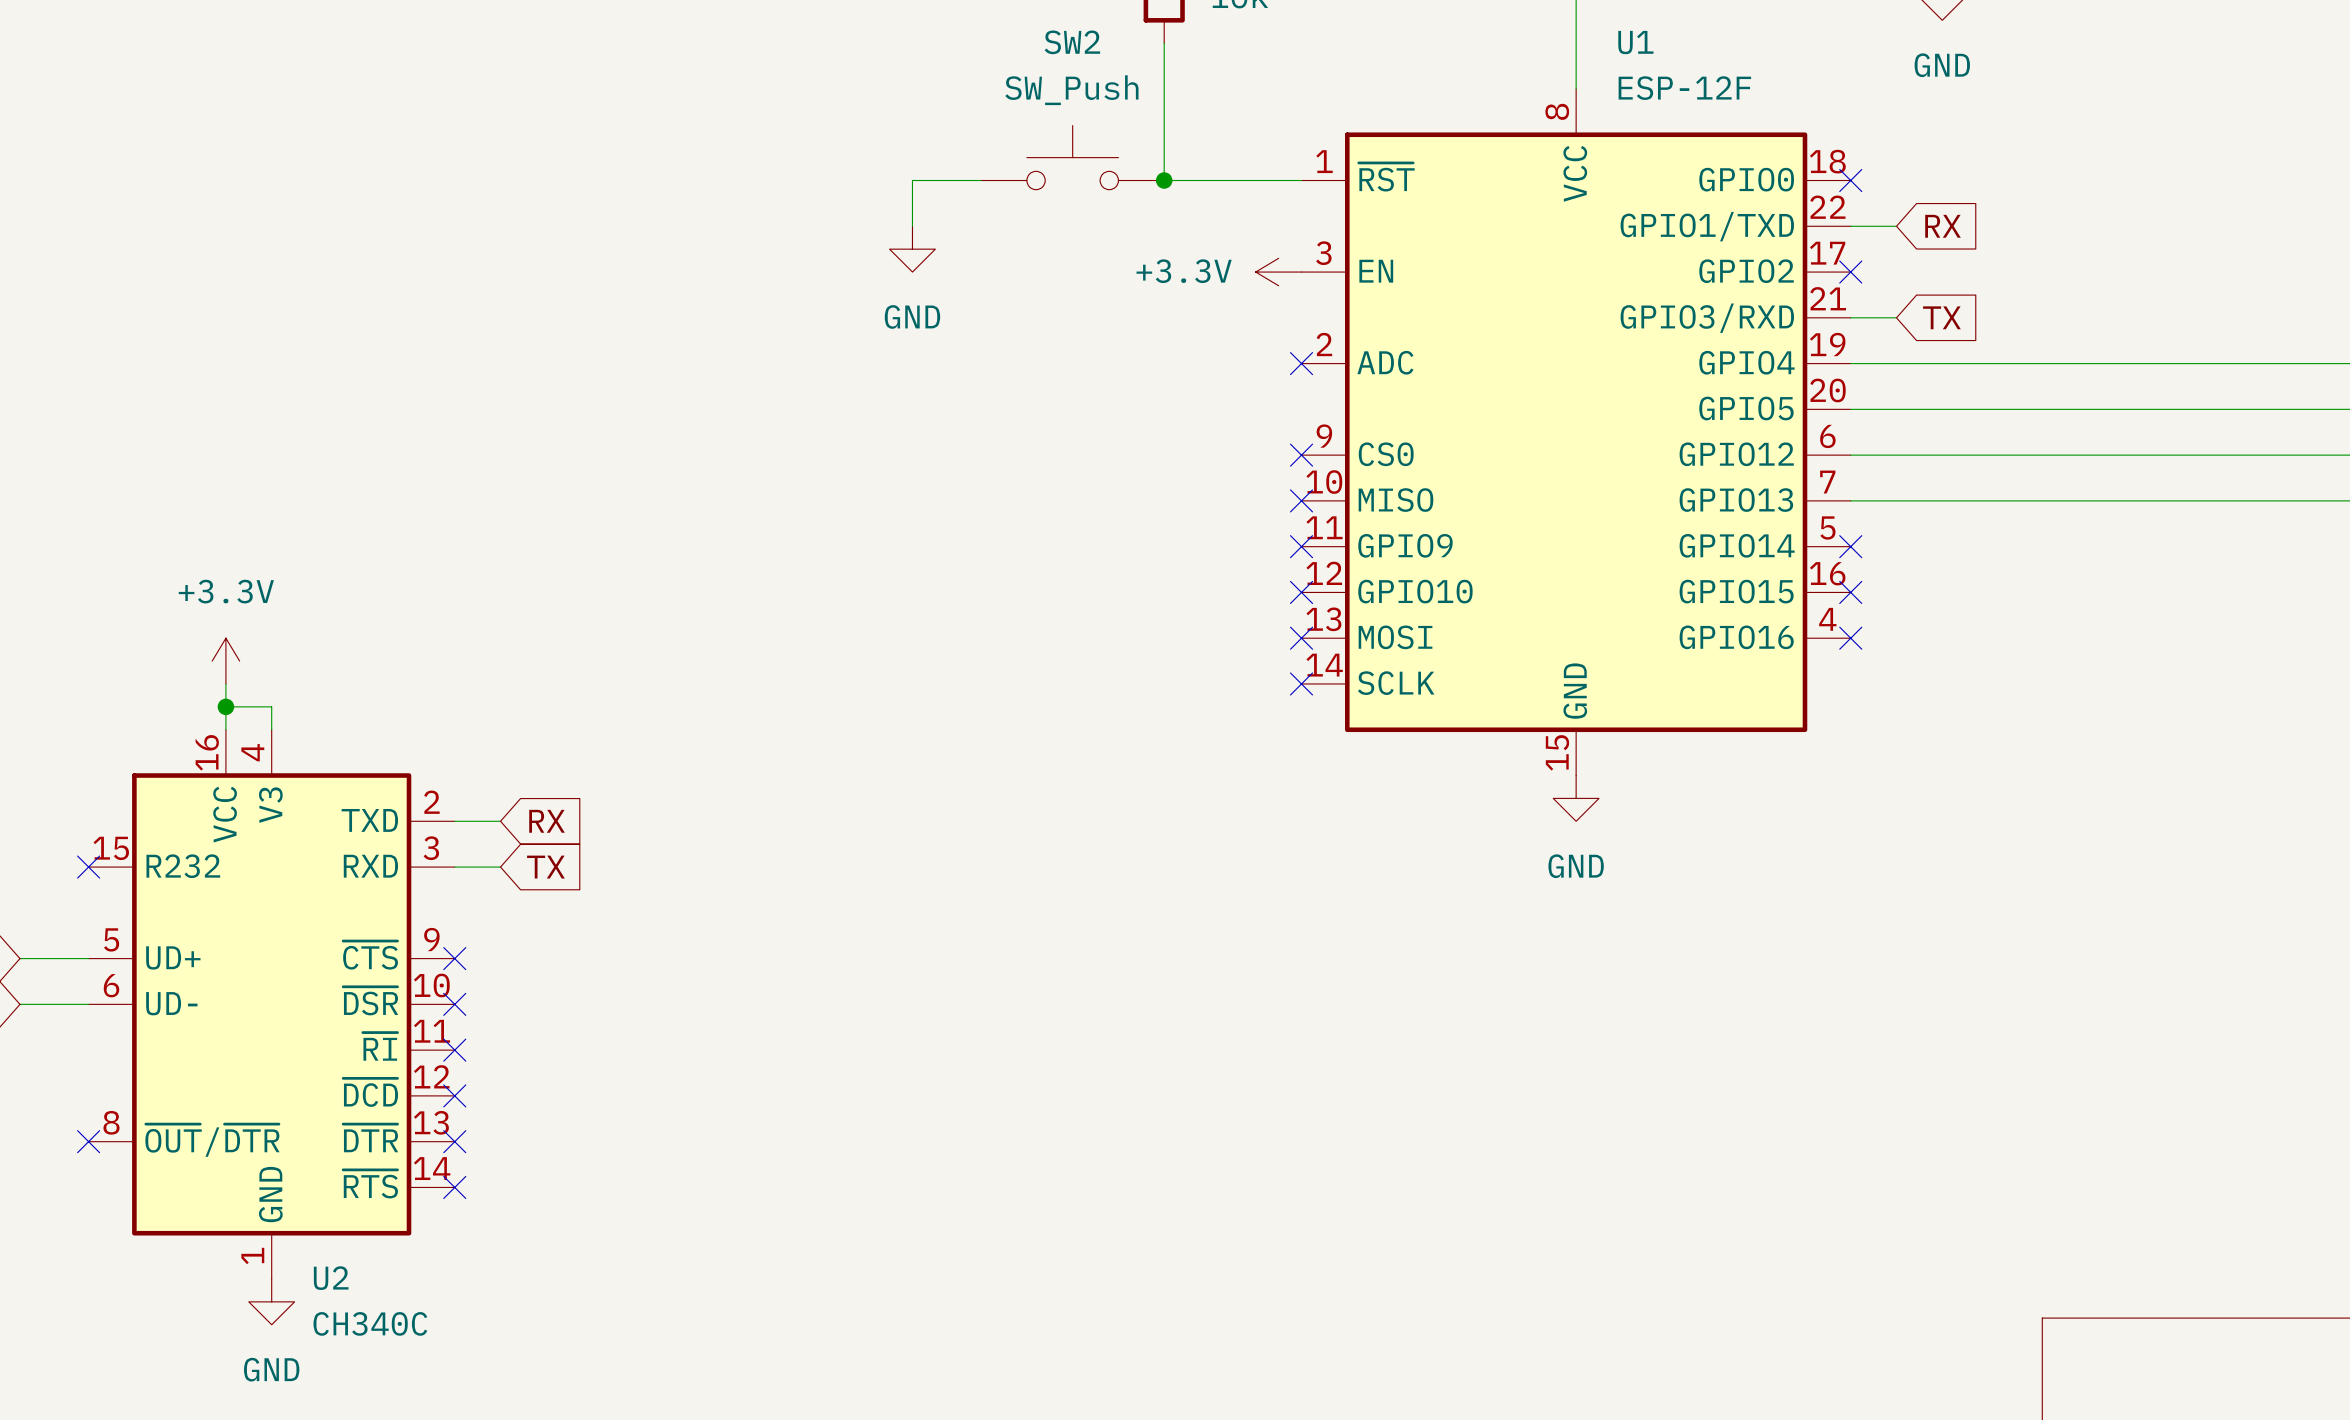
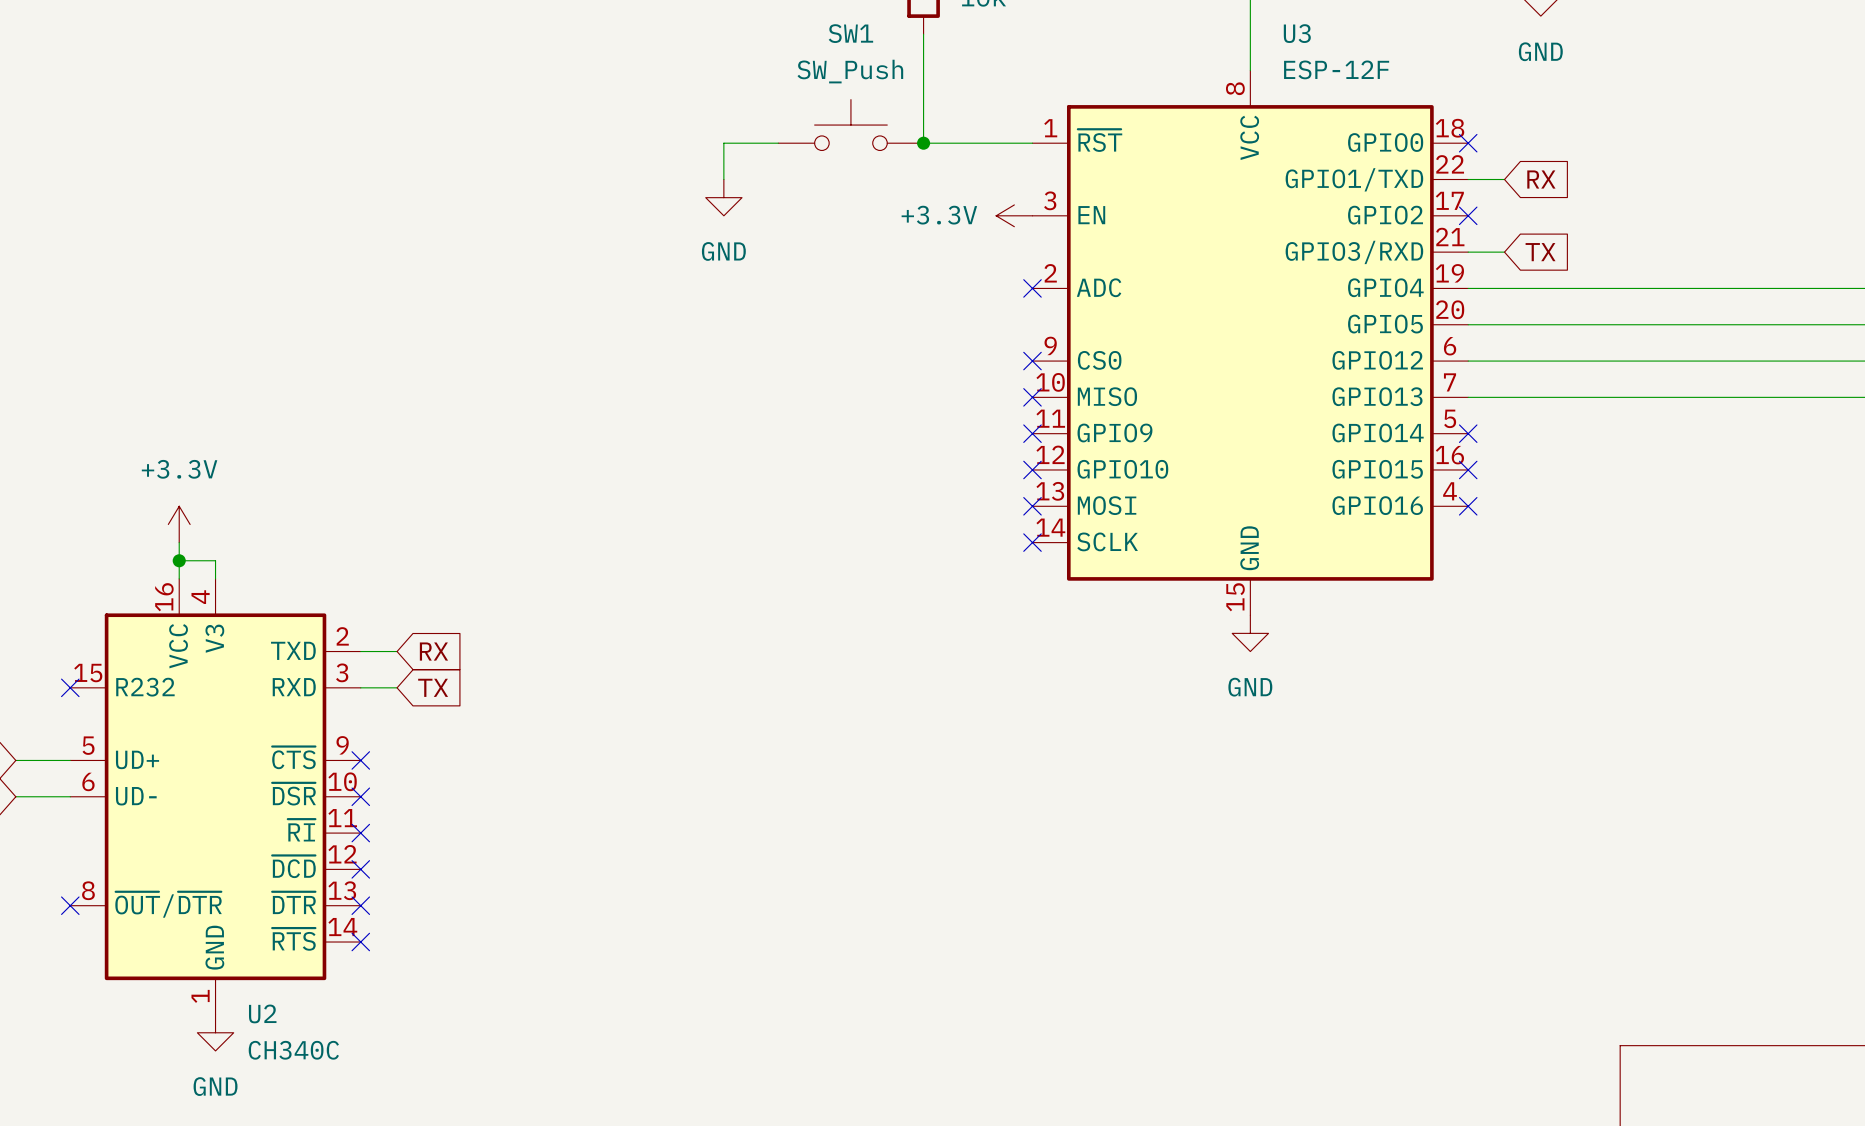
SW2 name: SW2 (1072, 42) -> SW1 (850, 33)
U1 name: U1 (1635, 42) -> U3 (1297, 33)

